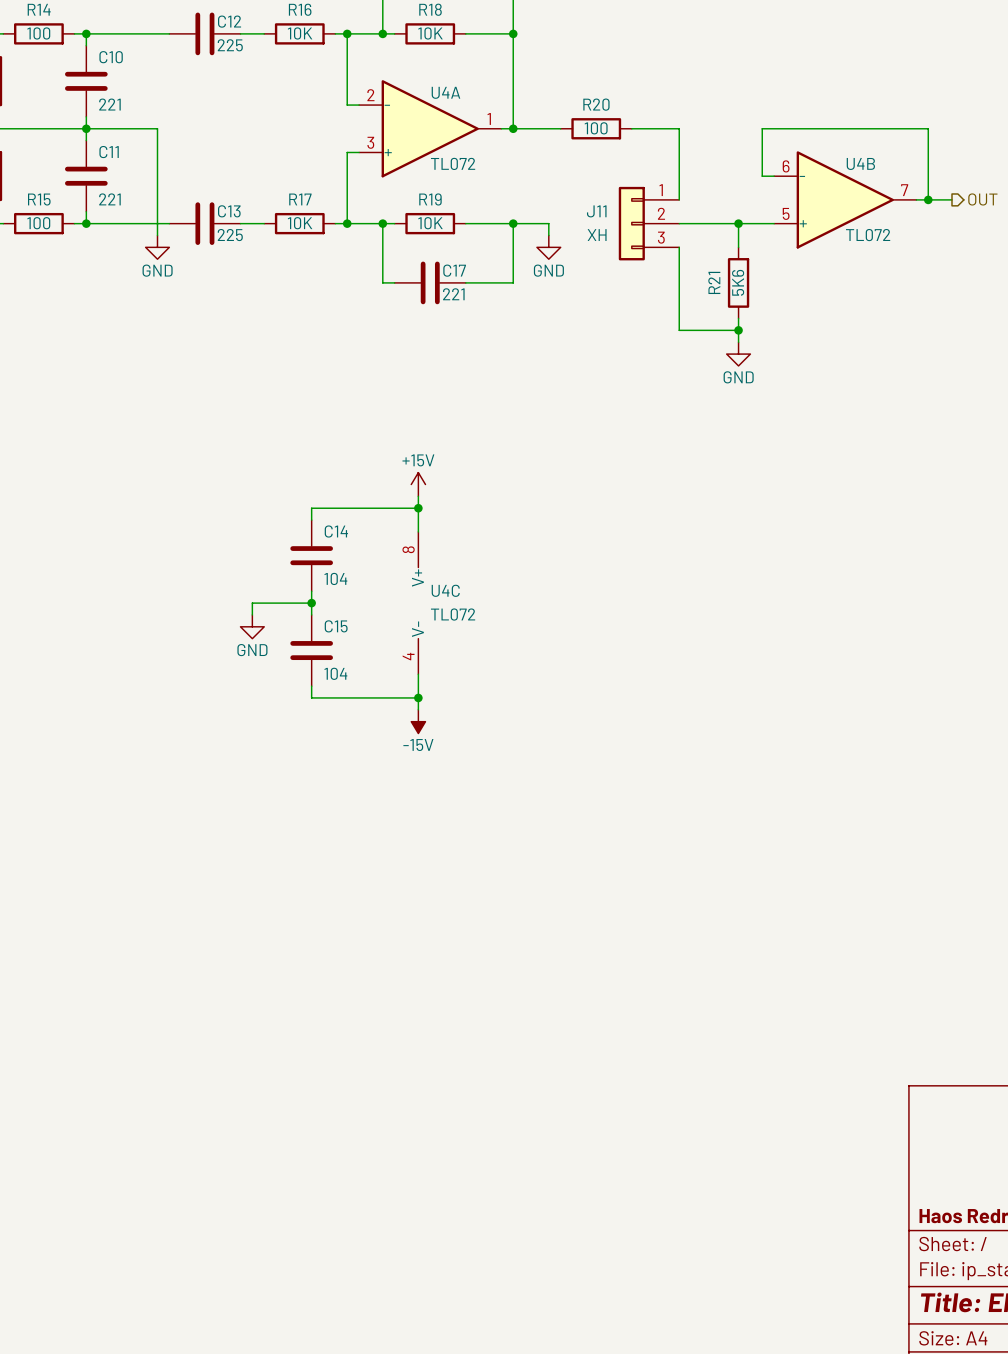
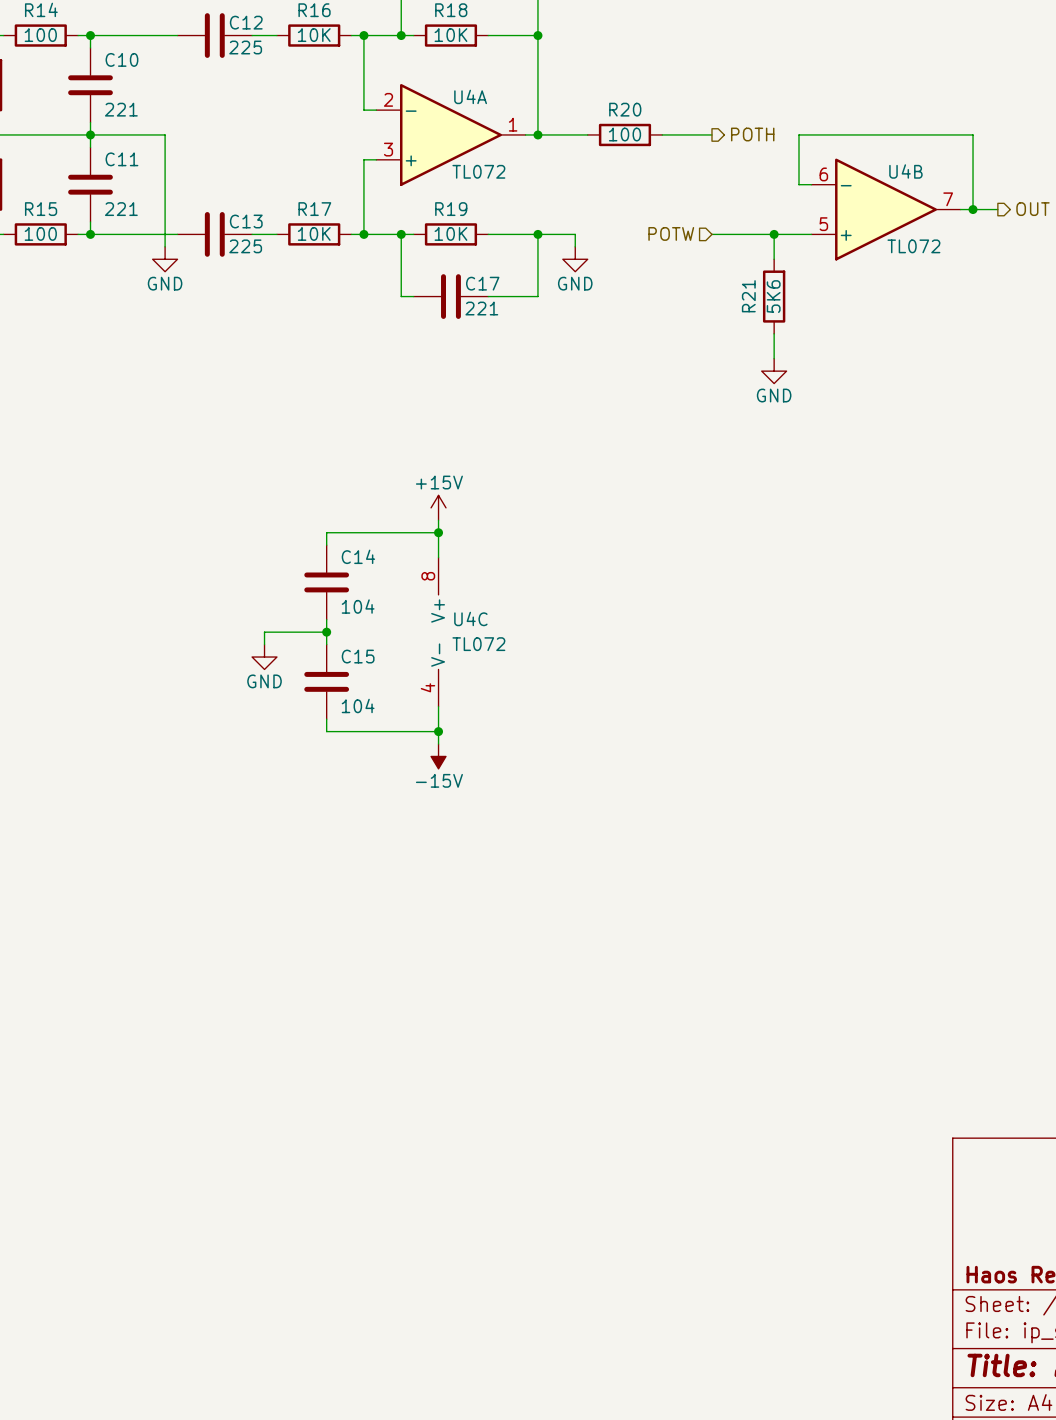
wire: (679, 128) (679, 199) -> none
hierarchical label: none -> POTH (752, 134)
hierarchical label: none -> POTW (671, 233)
J11: XH (649, 223) -> none
wire: (679, 247) (679, 330) (738, 330) -> none
junction: (738, 330) -> none

